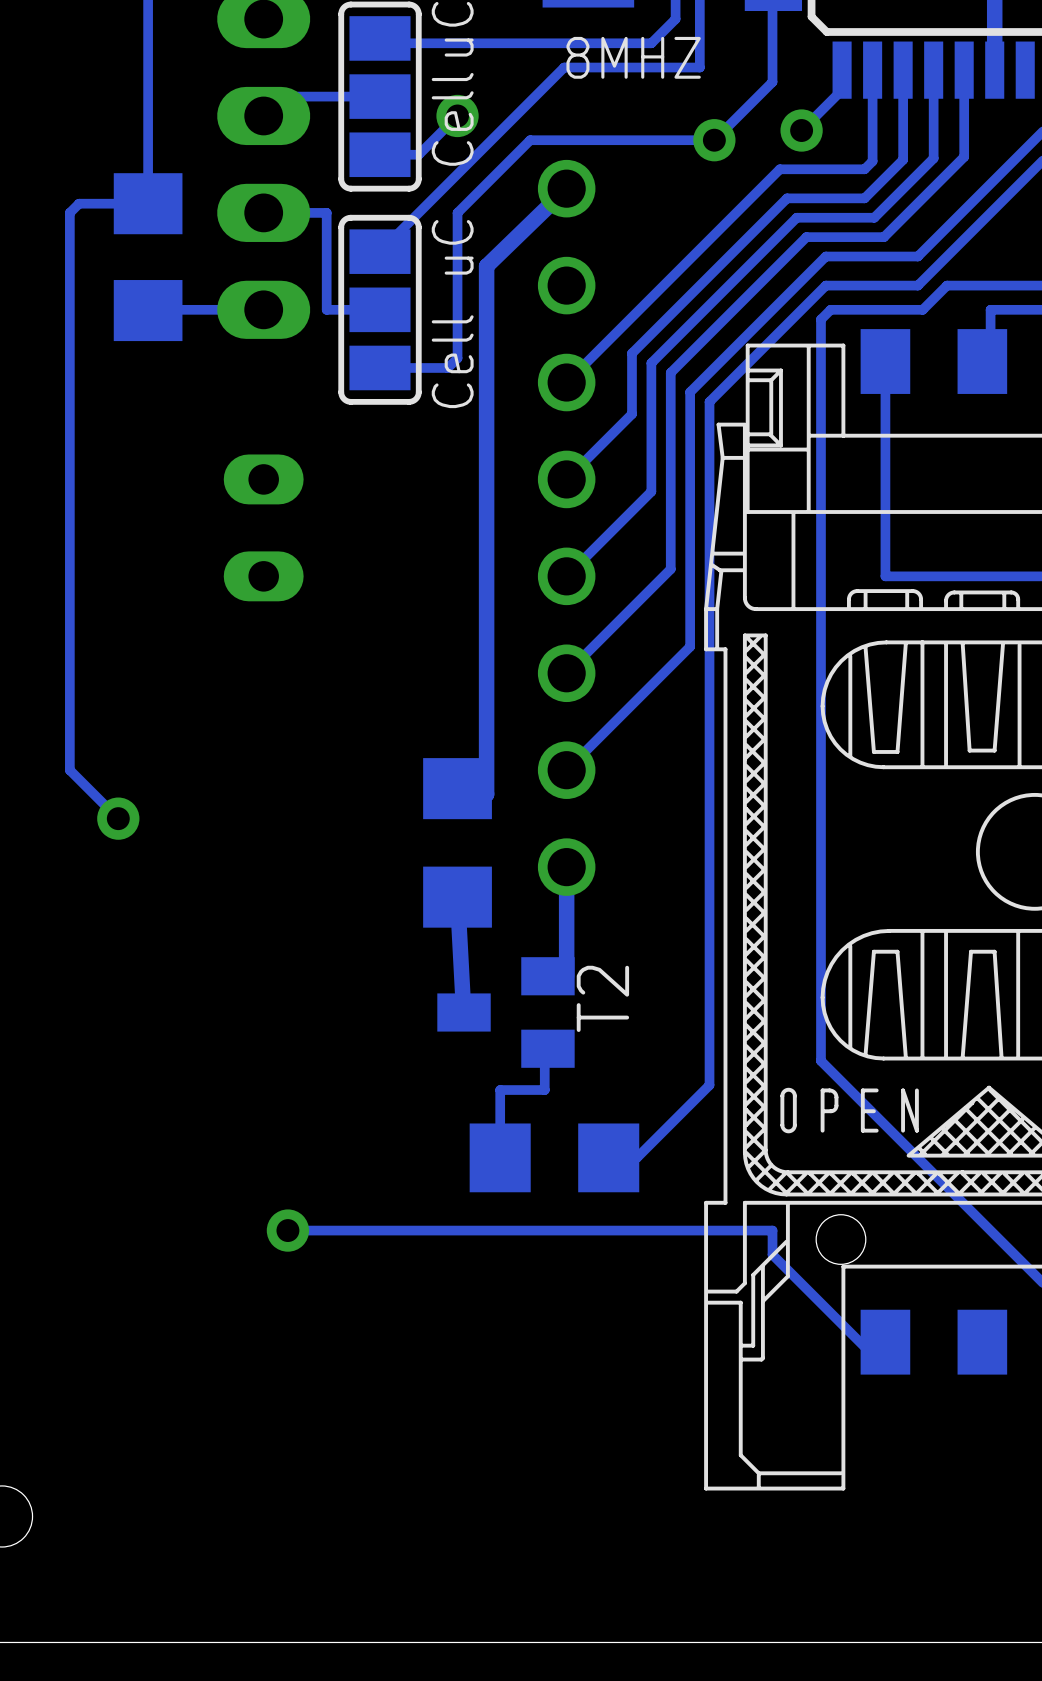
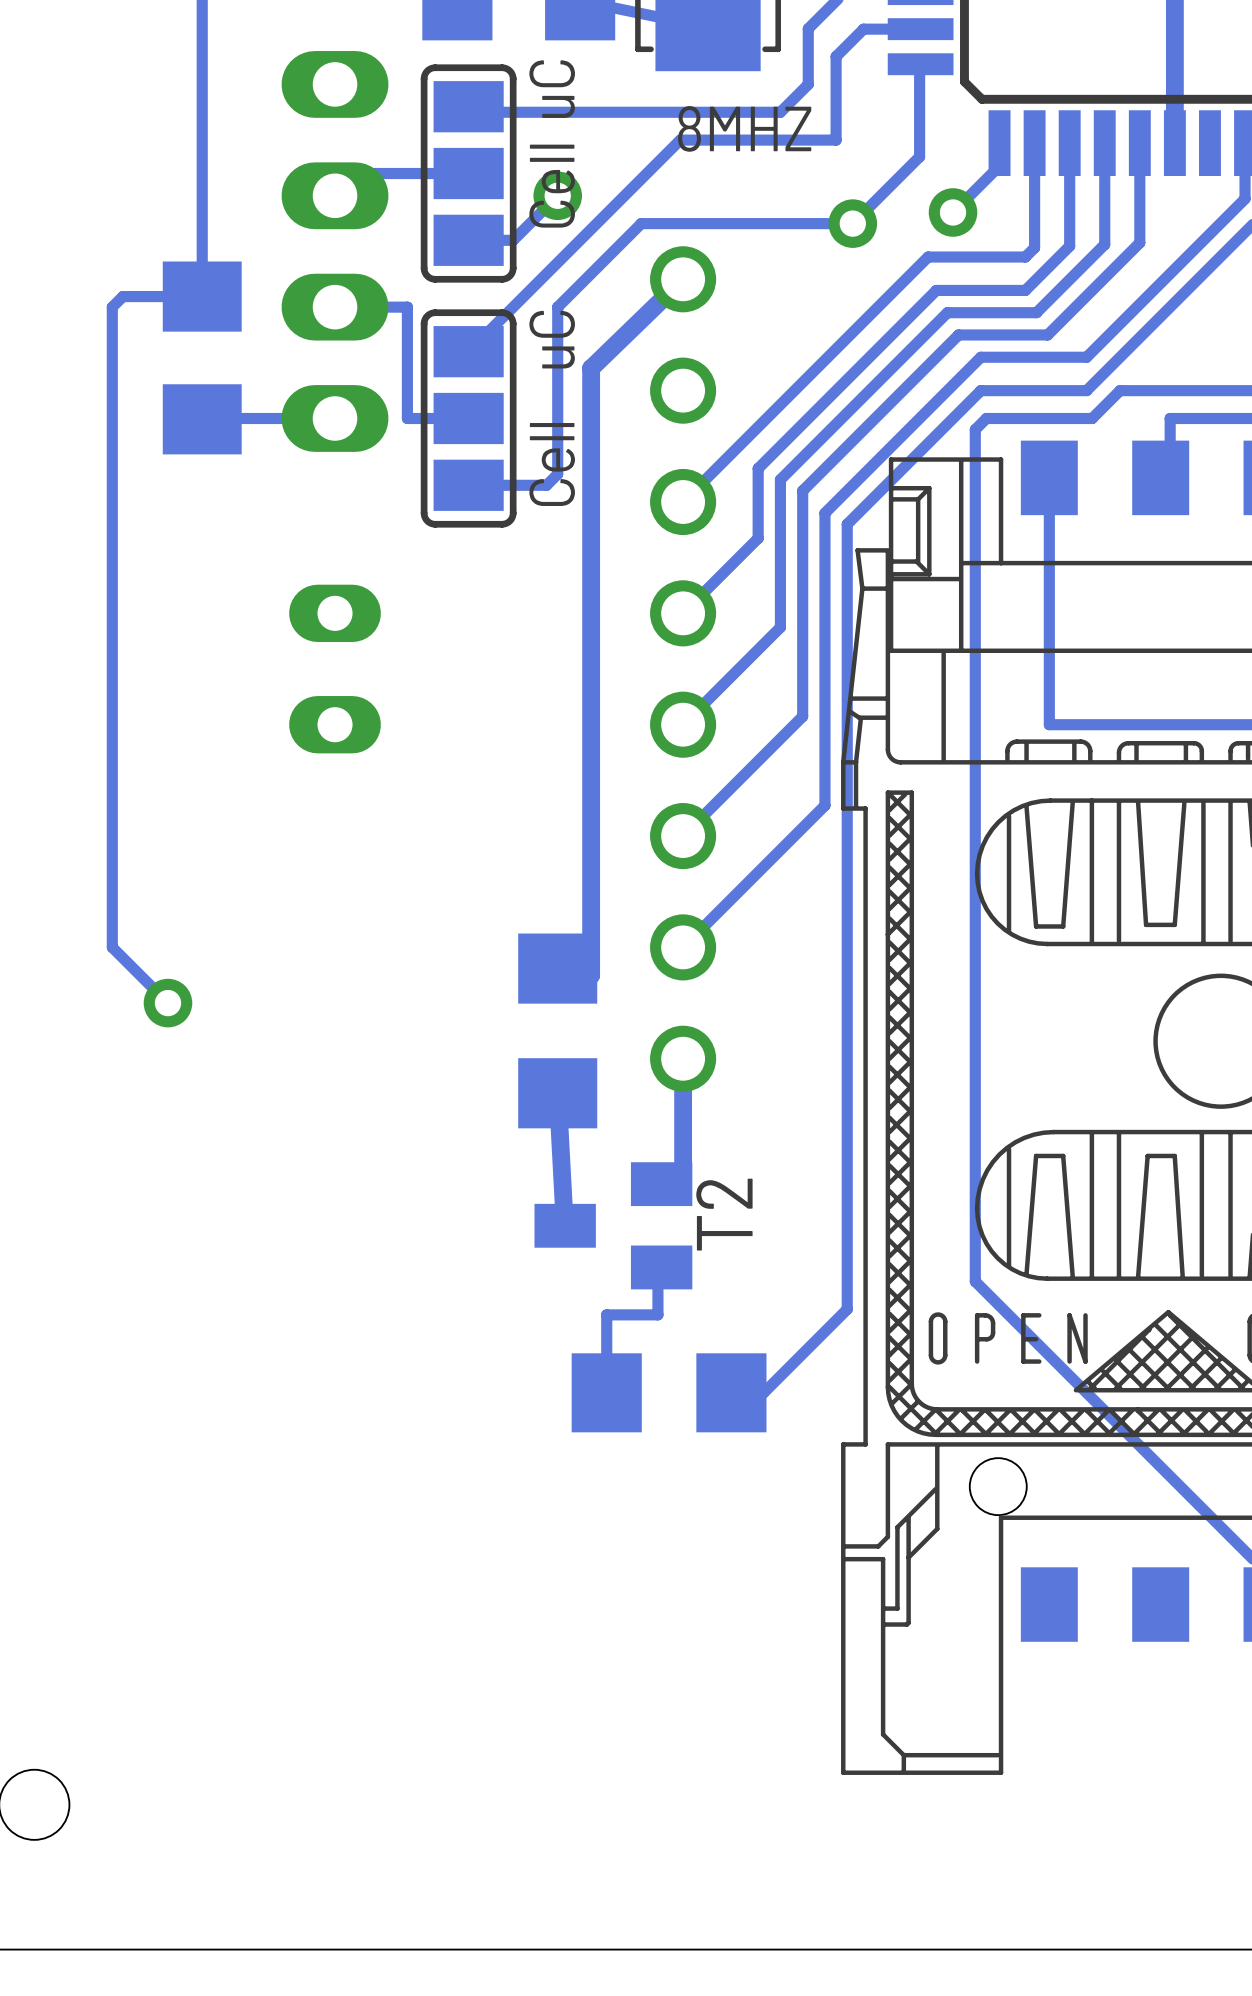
track: (287, 1230) (772, 1230) (772, 1254) (869, 1351) -> none
via: (287, 1230) -> none

